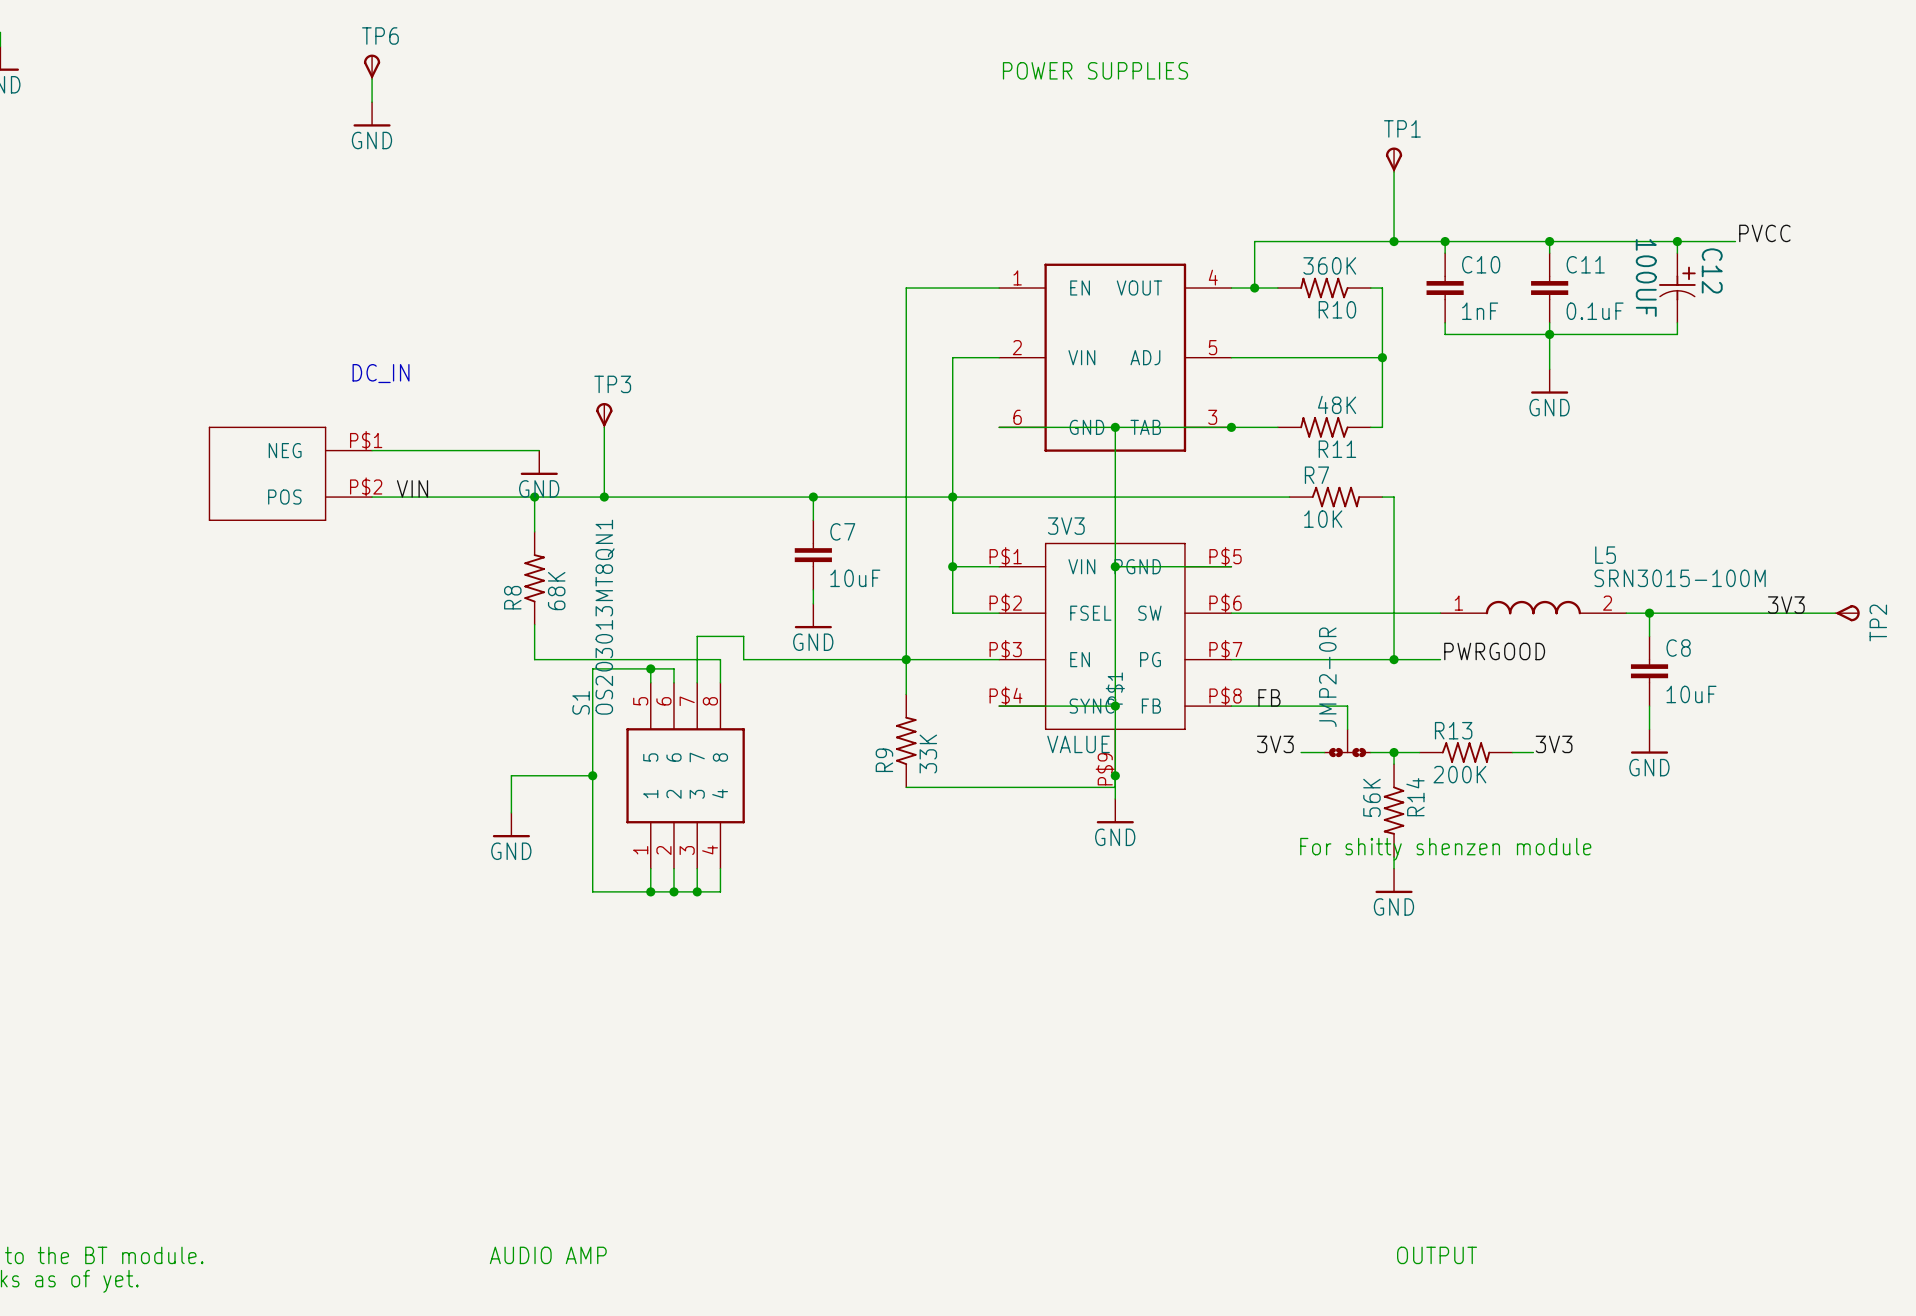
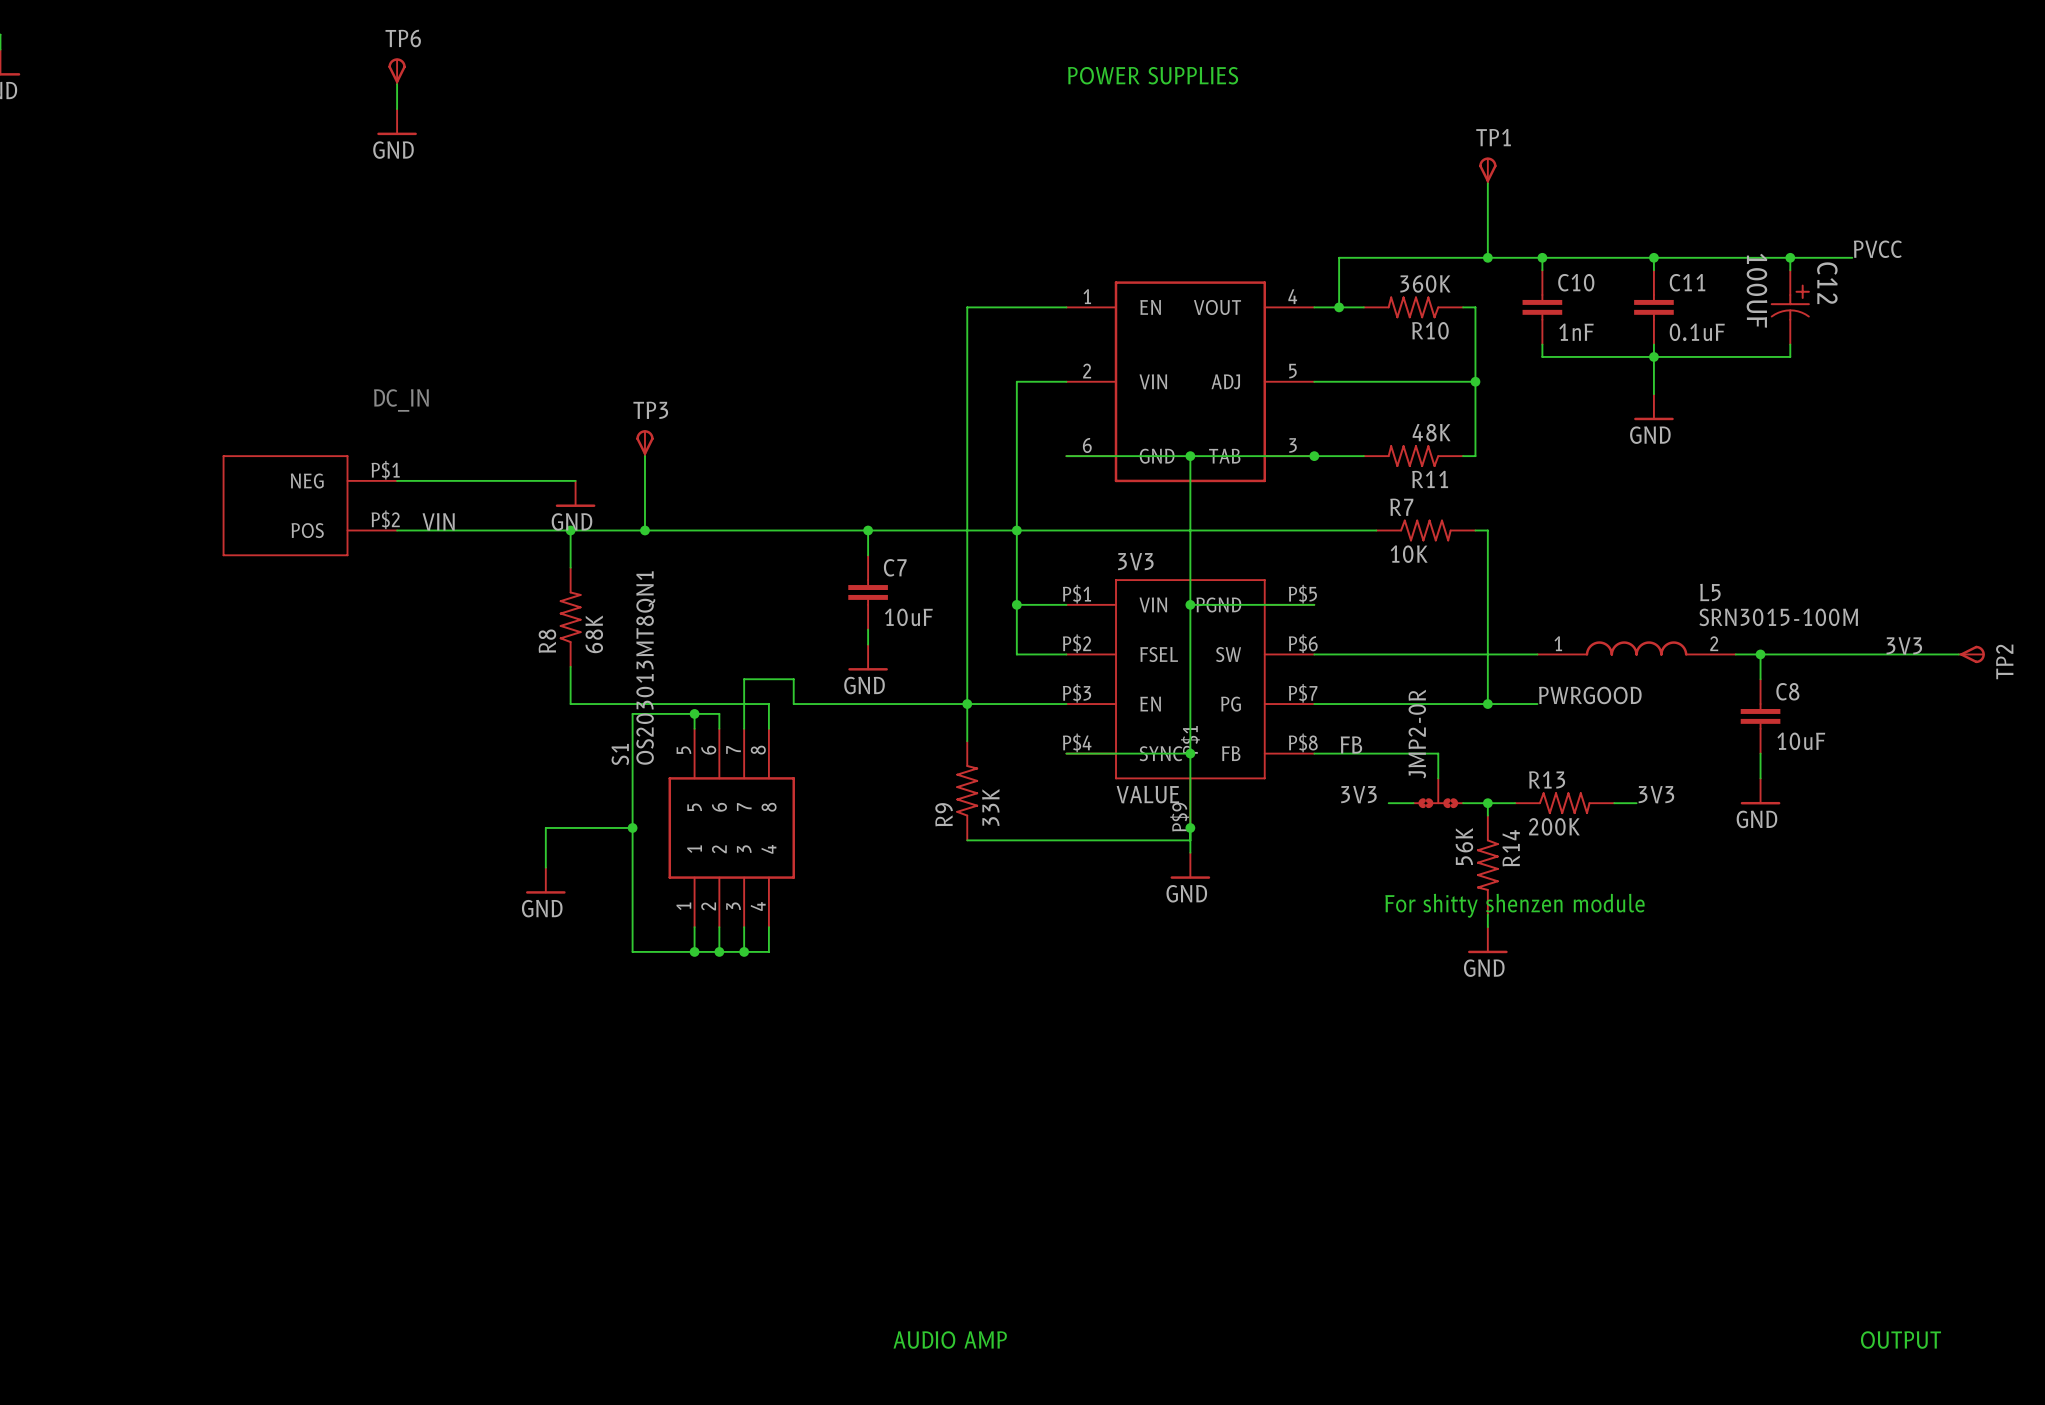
text: AUDIO AMP (548, 1255) -> none
text: none -> AUDIO AMP (950, 1339)
text: OUTPUT (1437, 1255) -> none
text: none -> OUTPUT (1901, 1339)

